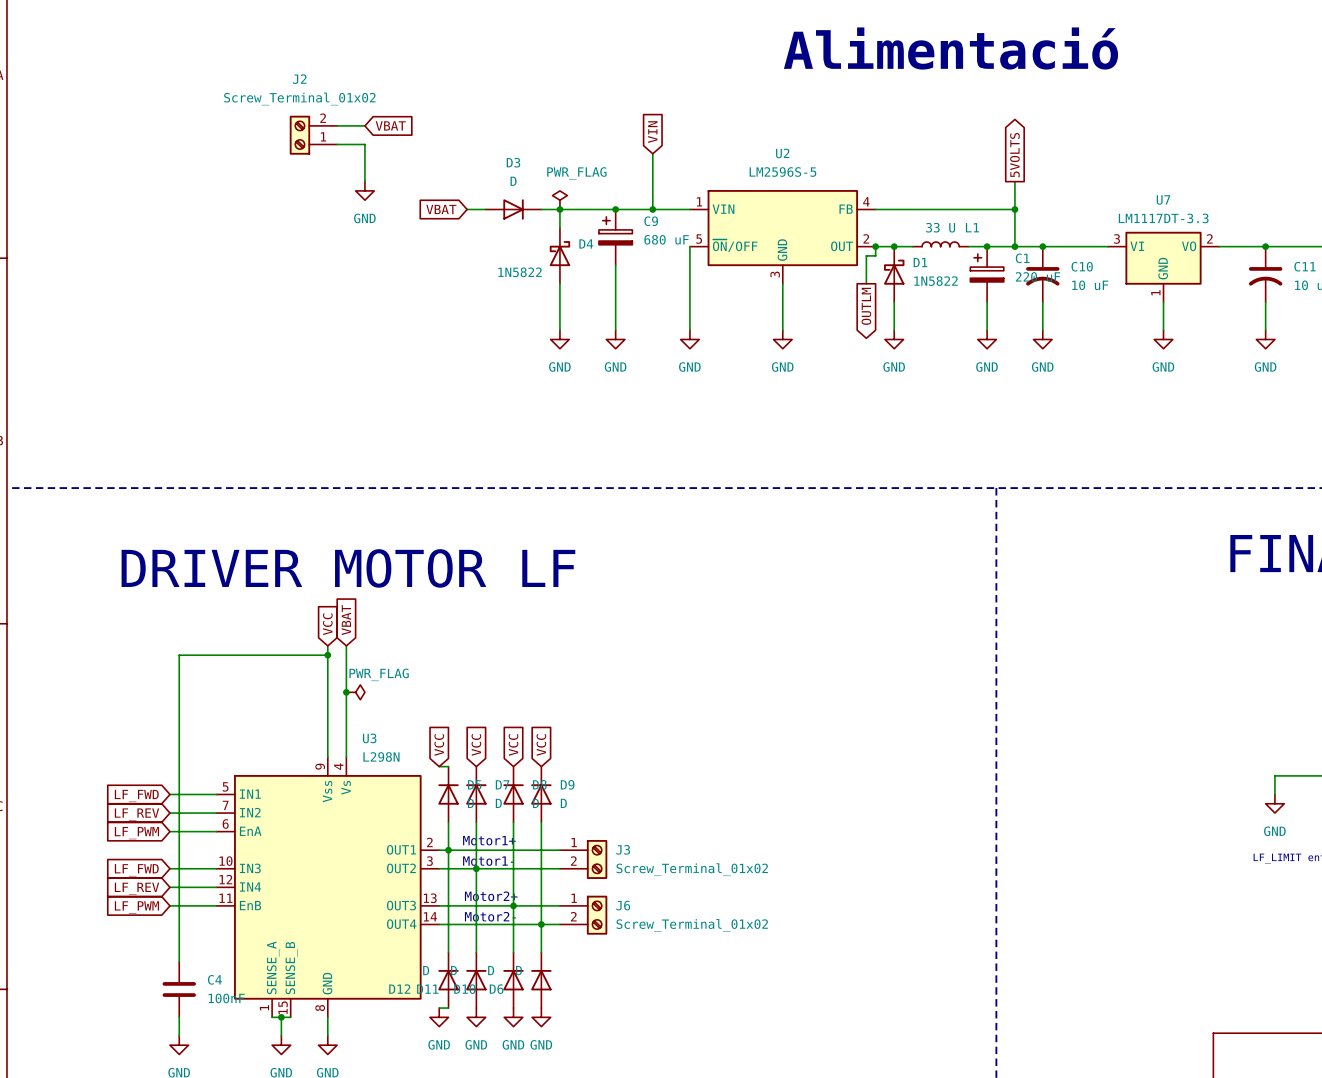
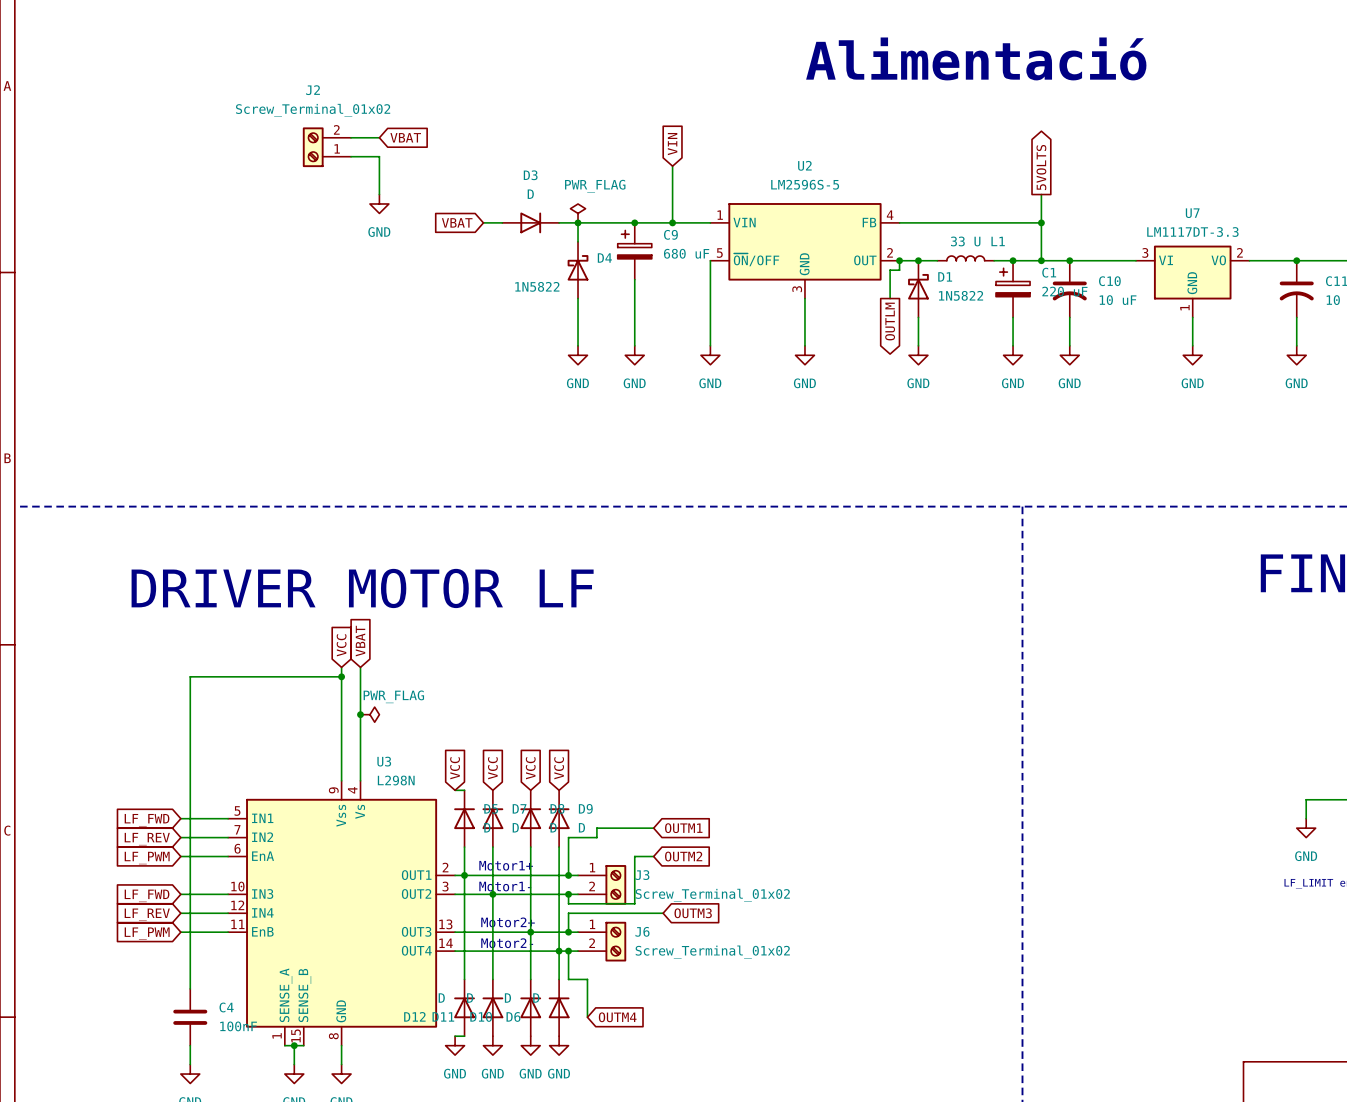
wire: none -> (653, 828) (596, 828) (596, 837) (568, 837) (568, 875)
global label: none -> OUTM1 (683, 828)
wire: none -> (653, 856) (634, 856) (634, 903) (568, 903) (568, 894)
global label: none -> OUTM2 (683, 856)
junction: none -> (568, 875)
junction: none -> (568, 894)
wire: none -> (663, 913) (568, 913) (568, 932)
global label: none -> OUTM3 (693, 913)
junction: none -> (568, 932)
wire: none -> (568, 951) (568, 979) (587, 979) (587, 1017)
junction: none -> (568, 951)
global label: none -> OUTM4 (617, 1017)

